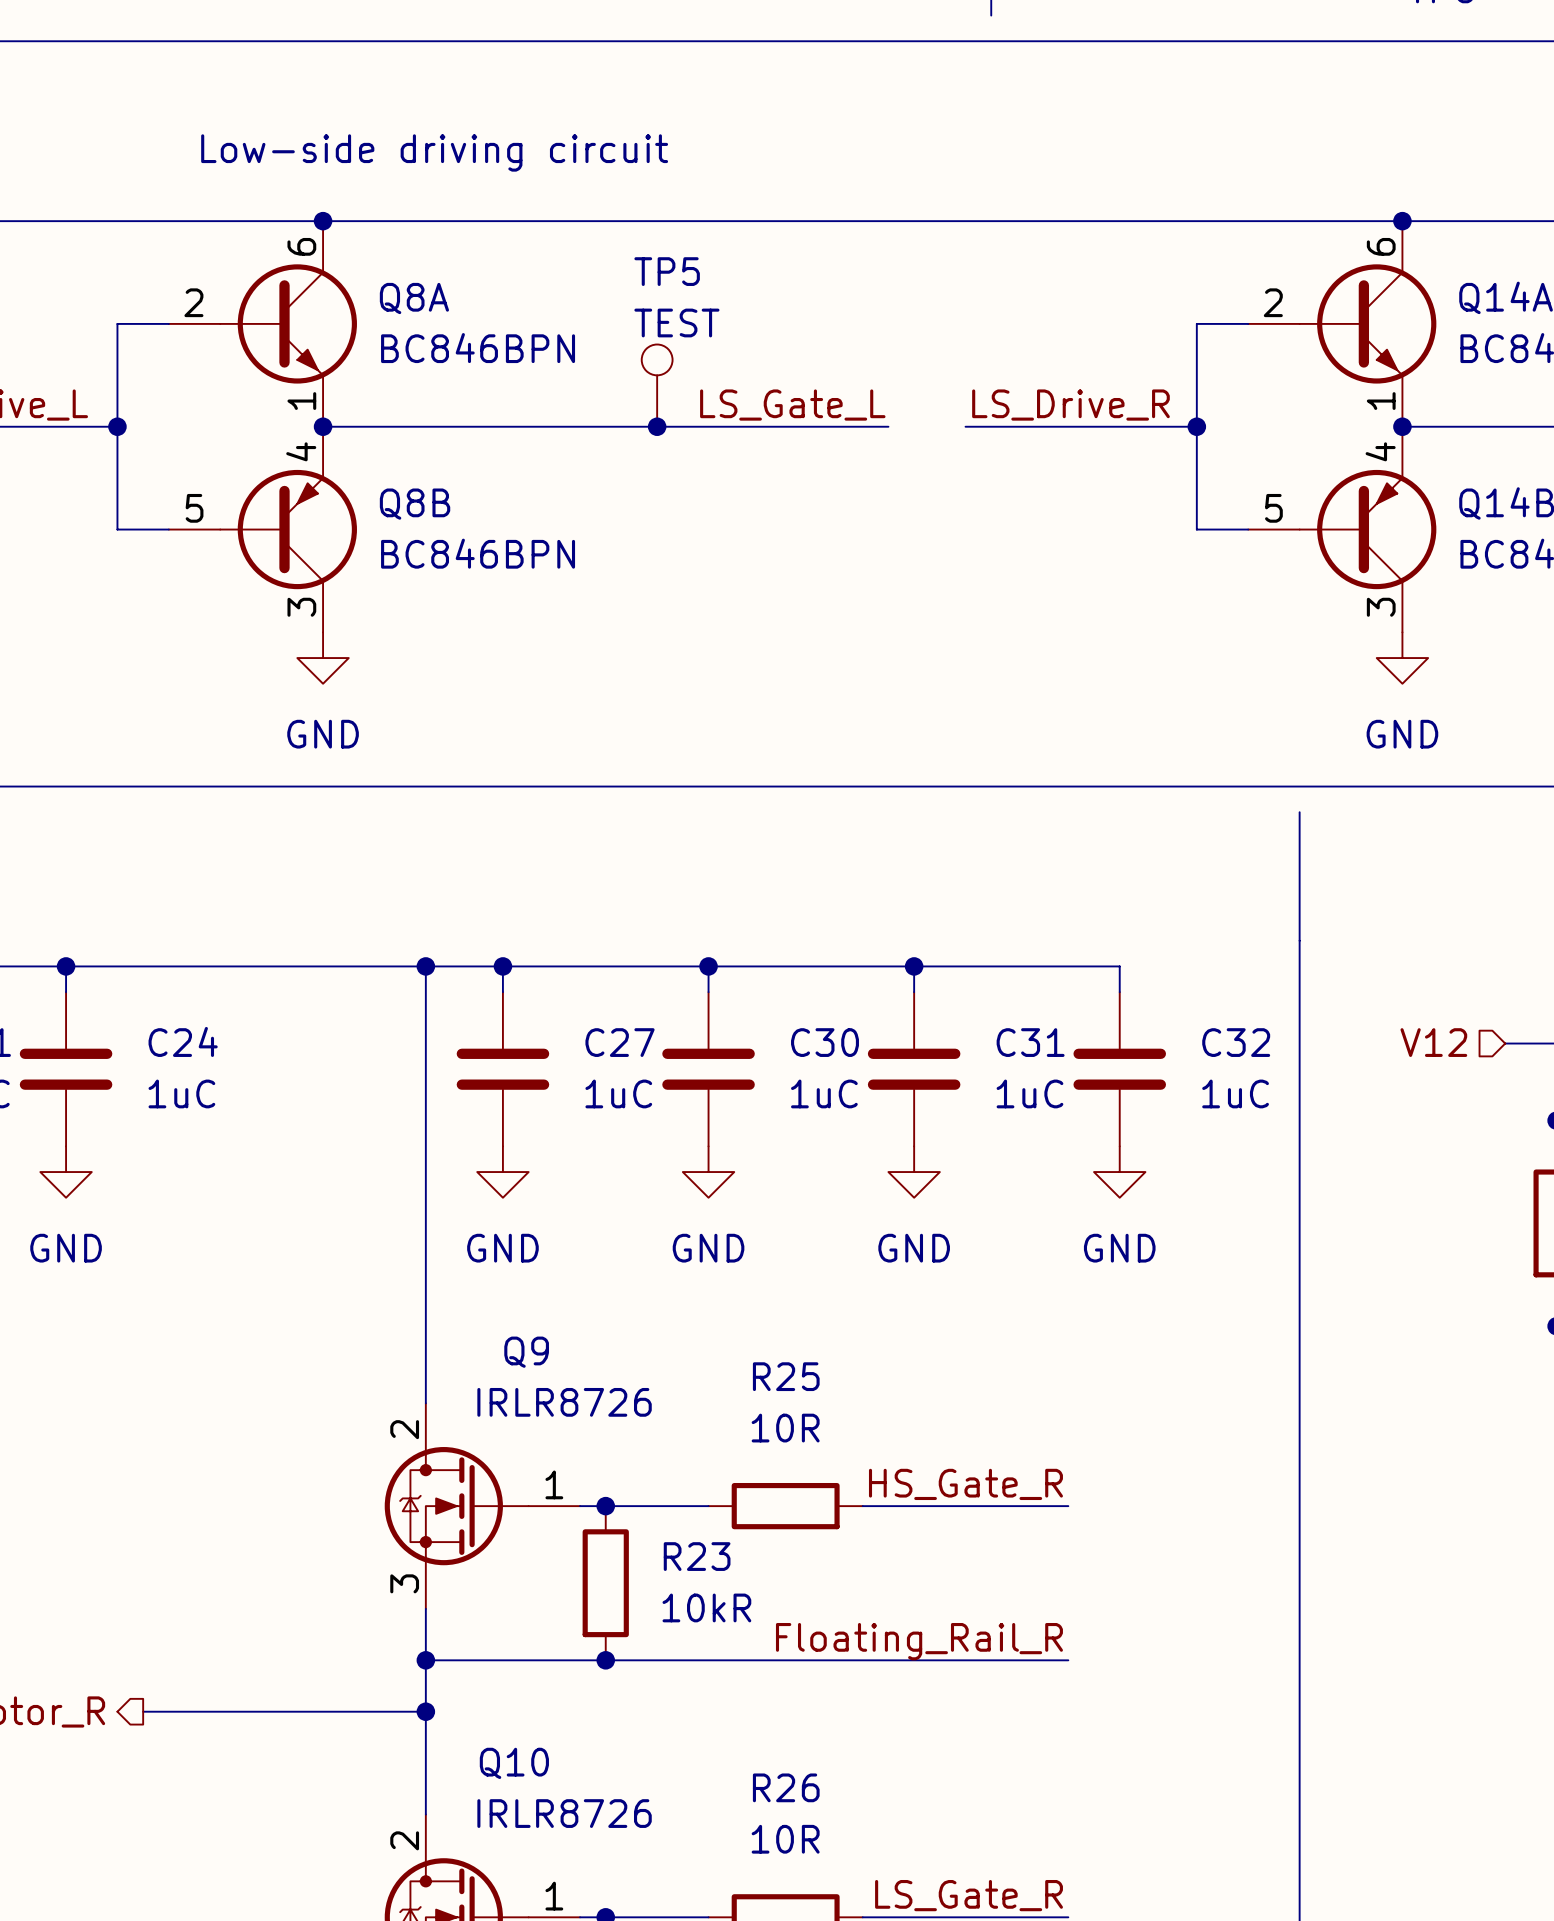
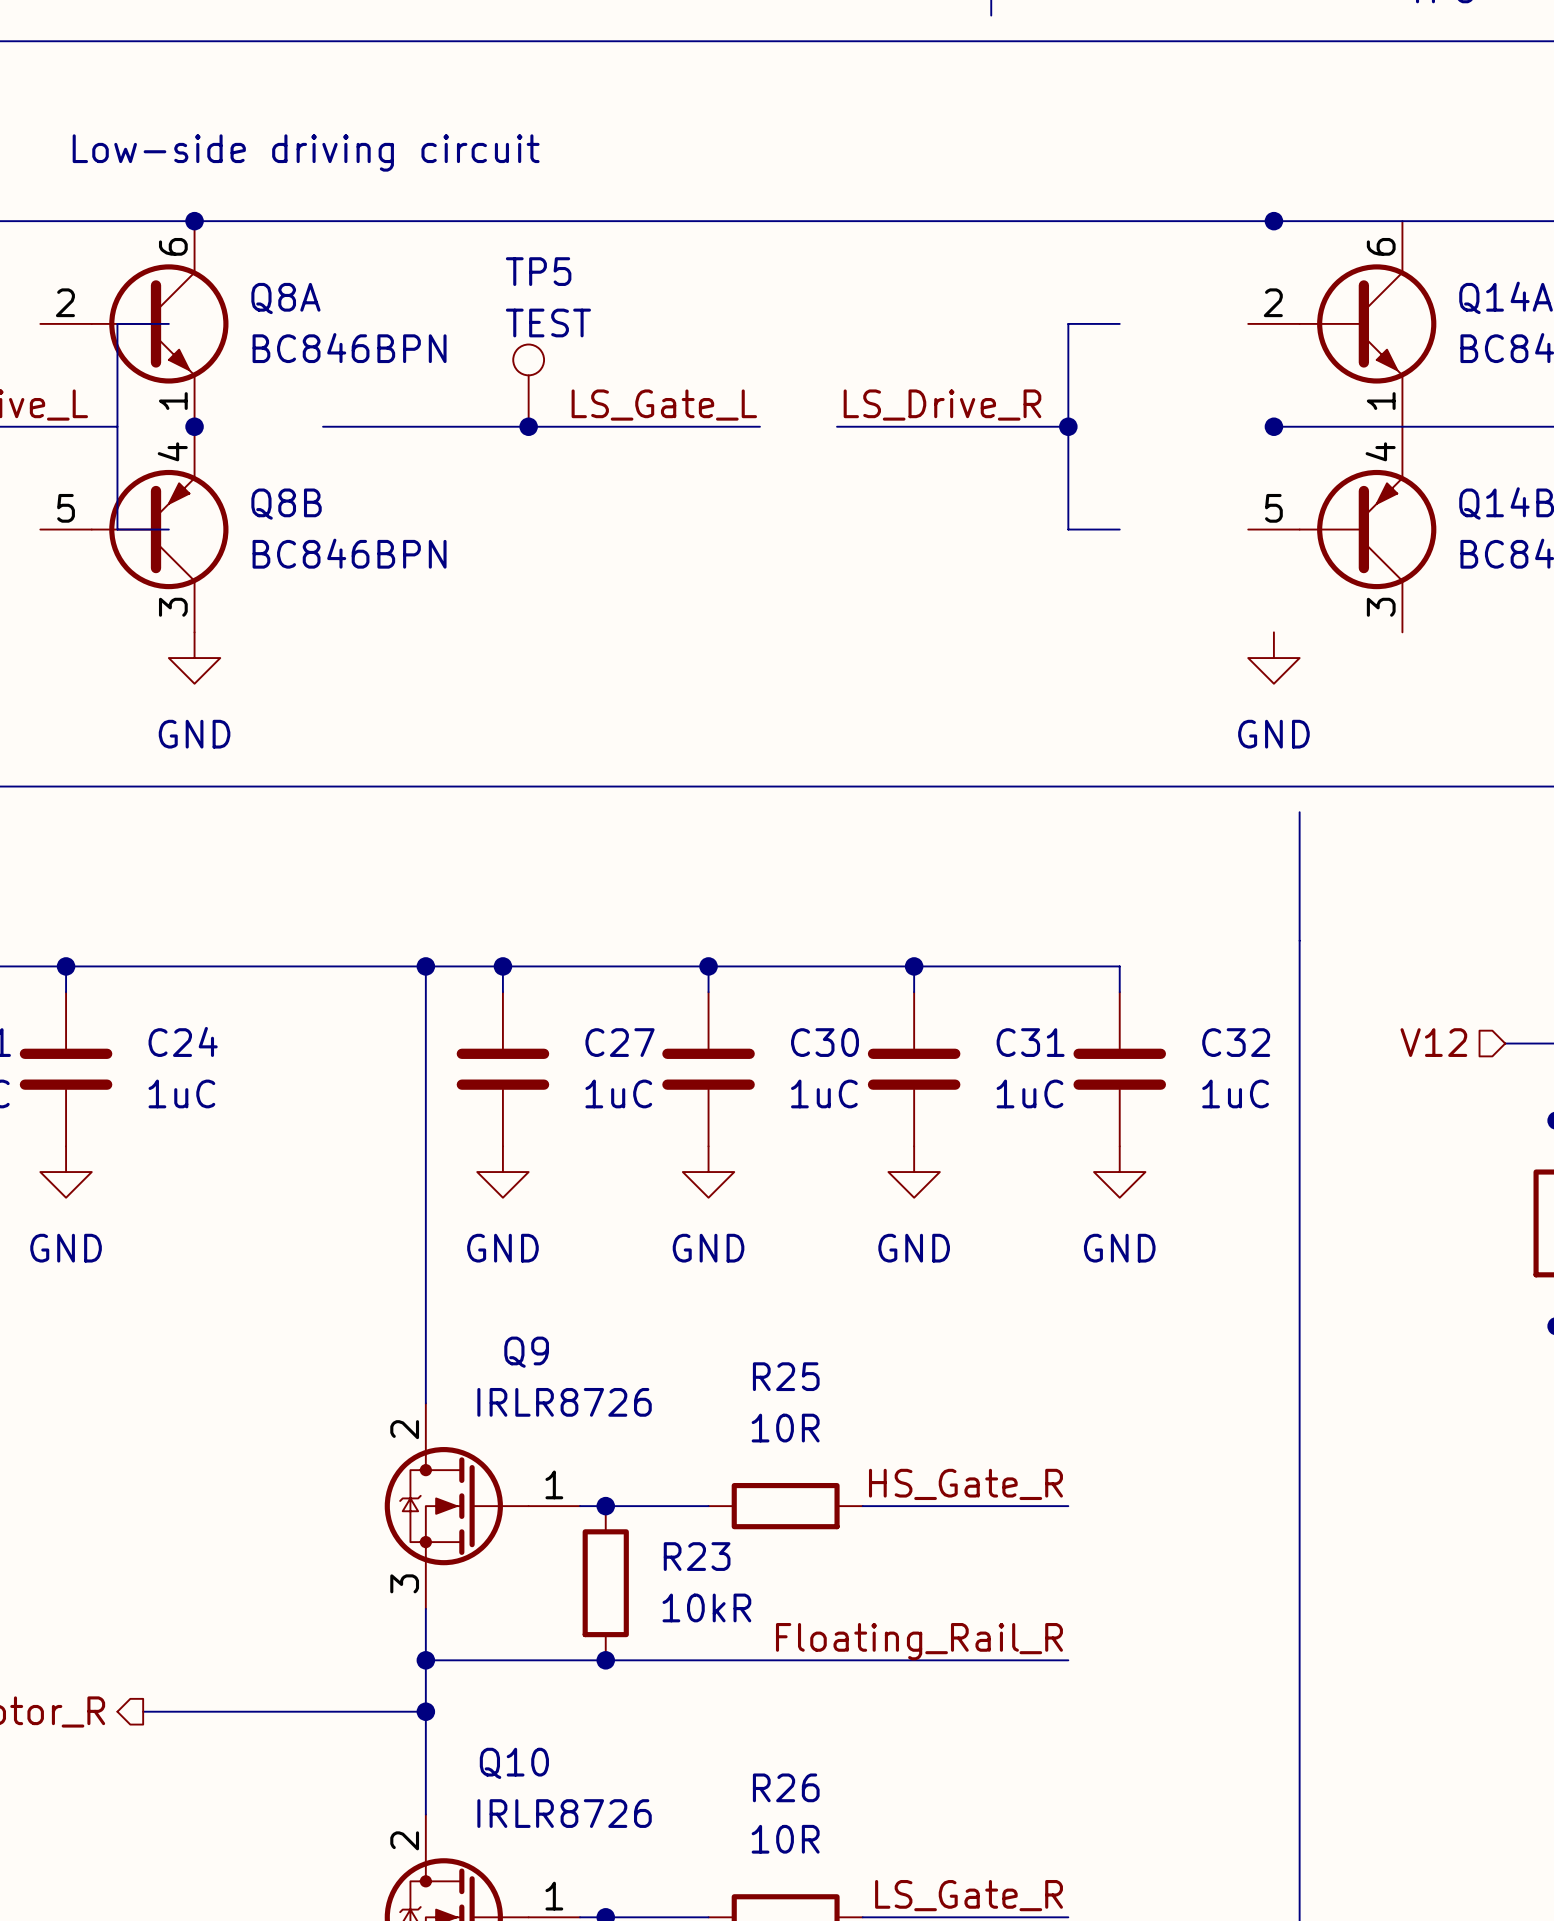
text position: Low-side driving circuit (434, 152) -> Low-side driving circuit (306, 152)
junction: none -> (194, 221)
junction: (323, 221) -> none
junction: none -> (1273, 221)
junction: (1402, 221) -> none
Q8A position: (262, 323) -> (134, 323)
wire: (1248, 323) (1196, 323) (1196, 529) (1248, 529) -> (1119, 323) (1068, 323) (1068, 529) (1119, 529)
TP5 position: (657, 385) -> (528, 385)
label position: LS_Gate_L (792, 405) -> LS_Gate_L (664, 405)
label position: LS_Drive_R (1070, 405) -> LS_Drive_R (942, 405)
junction: (117, 426) -> none
junction: none -> (194, 426)
junction: (323, 426) -> none
junction: none -> (528, 426)
junction: (657, 426) -> none
wire: (759, 426) (837, 426) -> (888, 426) (965, 426)
wire: (1068, 426) (1196, 426) -> (1273, 426) (1402, 426)
junction: none -> (1068, 426)
junction: (1196, 426) -> none
junction: none -> (1273, 426)
junction: (1402, 426) -> none
Q8B position: (262, 529) -> (134, 529)
power symbol position: GND (323, 658) -> GND (194, 658)
power symbol position: GND (1402, 658) -> GND (1273, 658)

